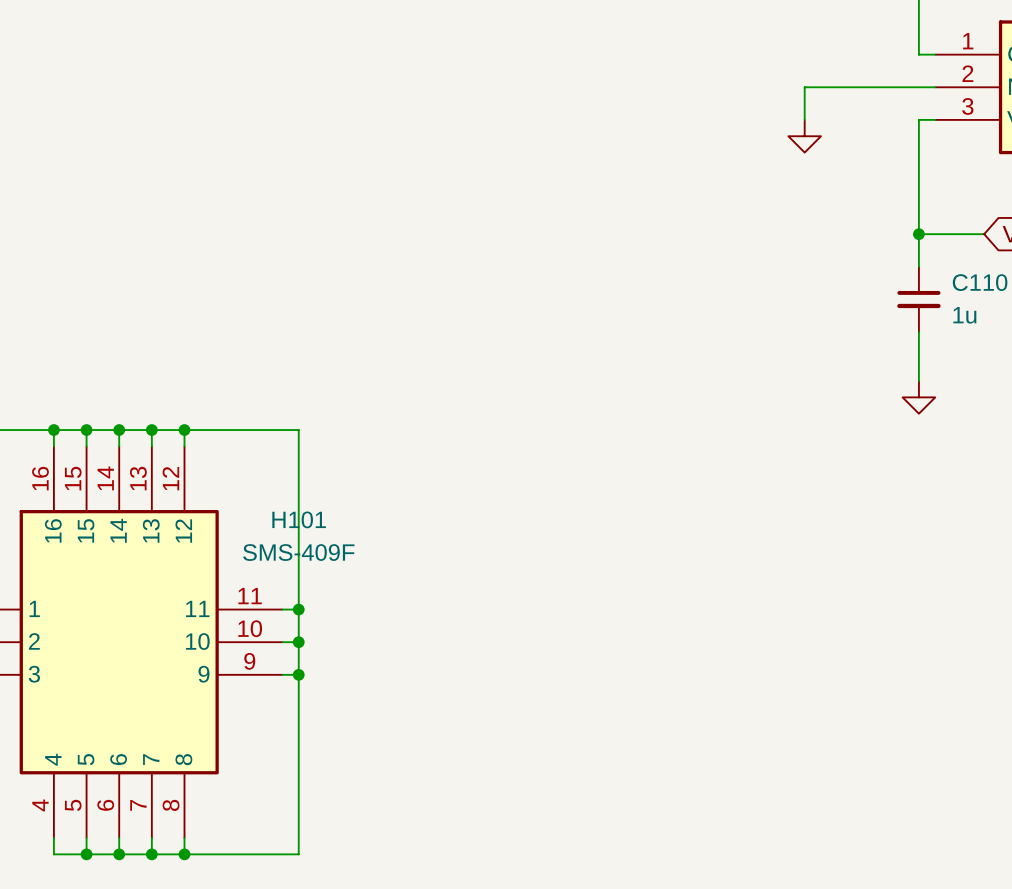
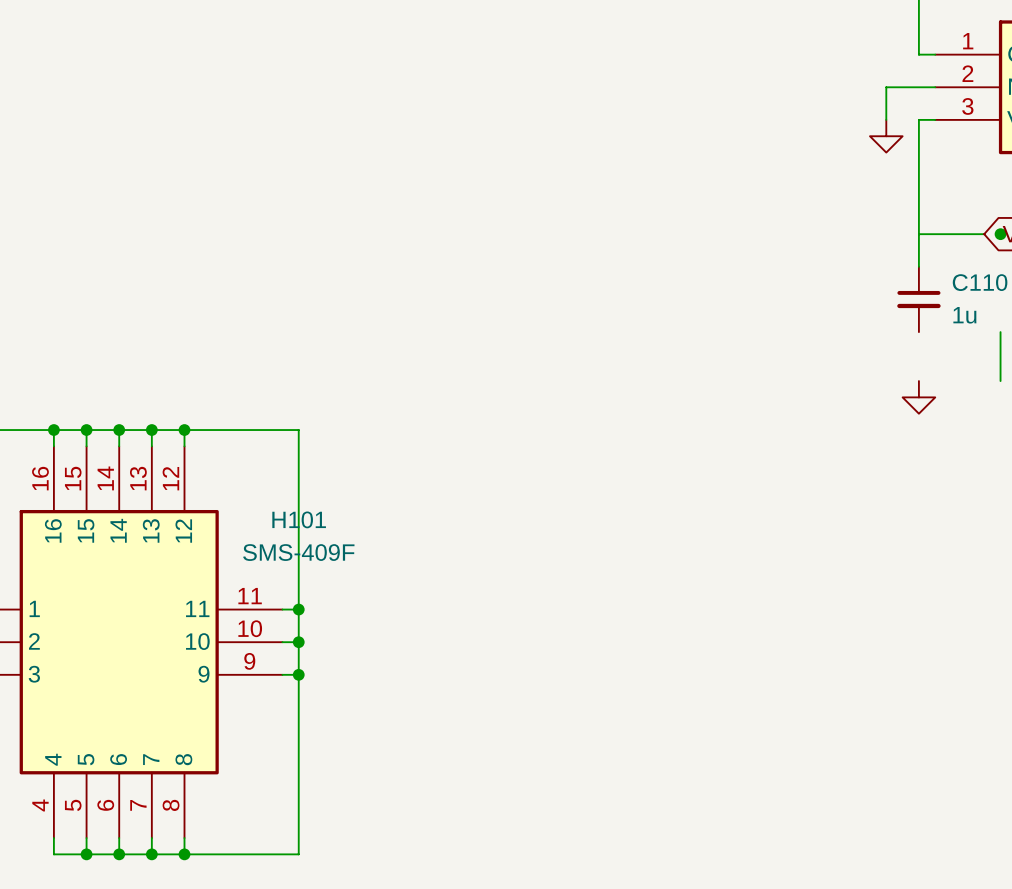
wire: (886, 87) (804, 87) (804, 119) -> (886, 87) (886, 119)
power symbol position: (804, 136) -> (886, 136)
junction: (918, 234) -> none
junction: none -> (1000, 234)
wire: (918, 332) (918, 381) -> (1000, 332) (1000, 381)

